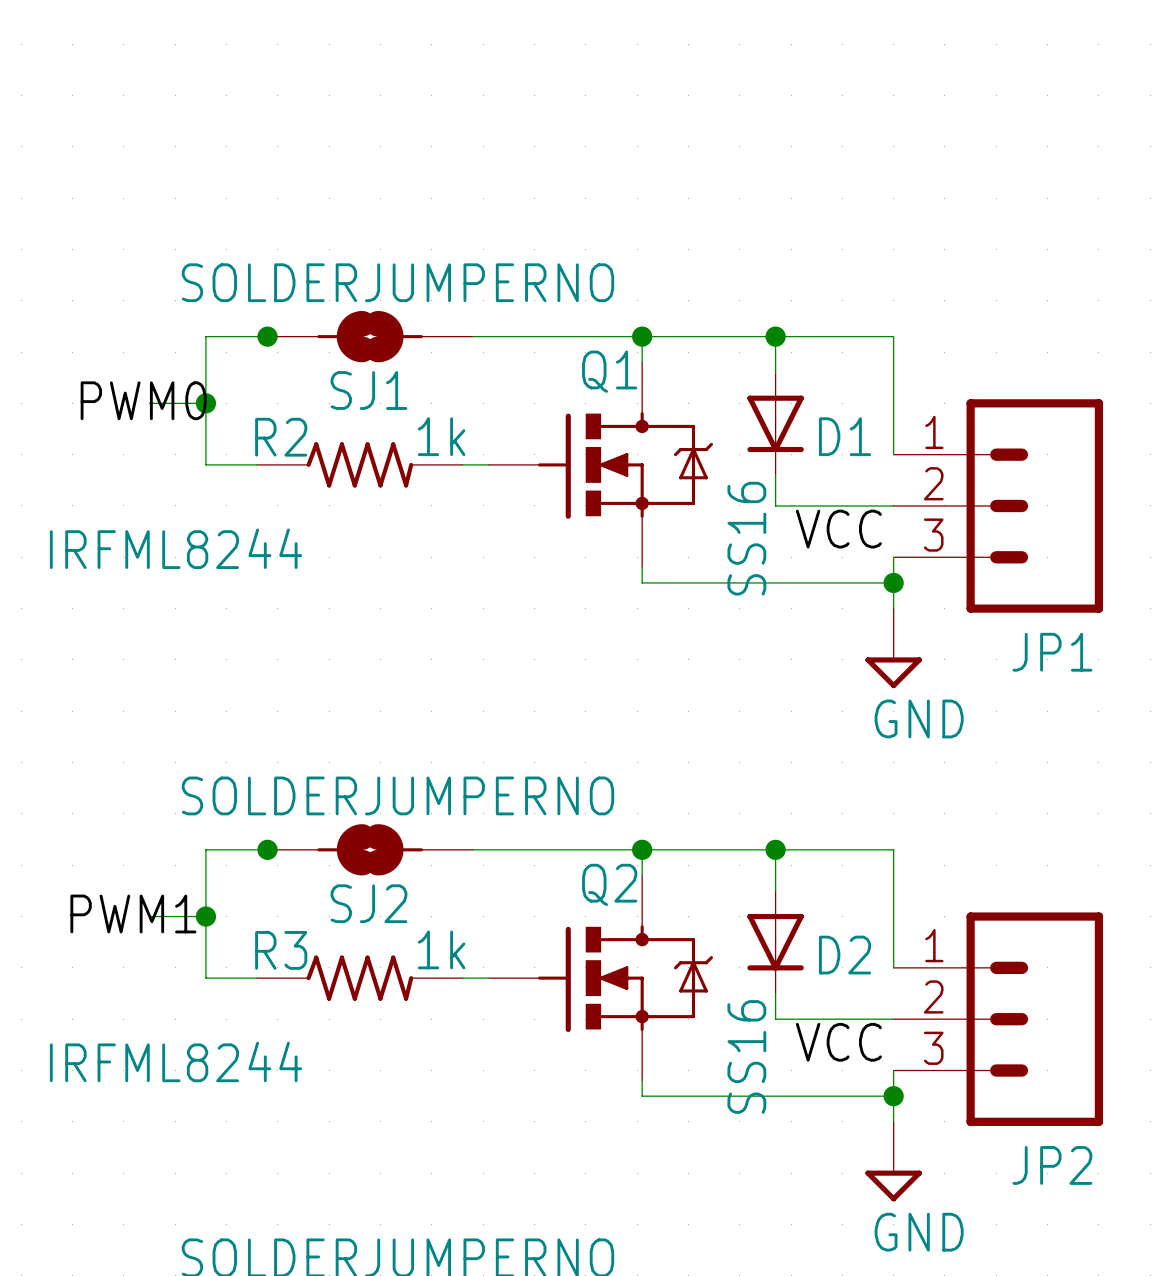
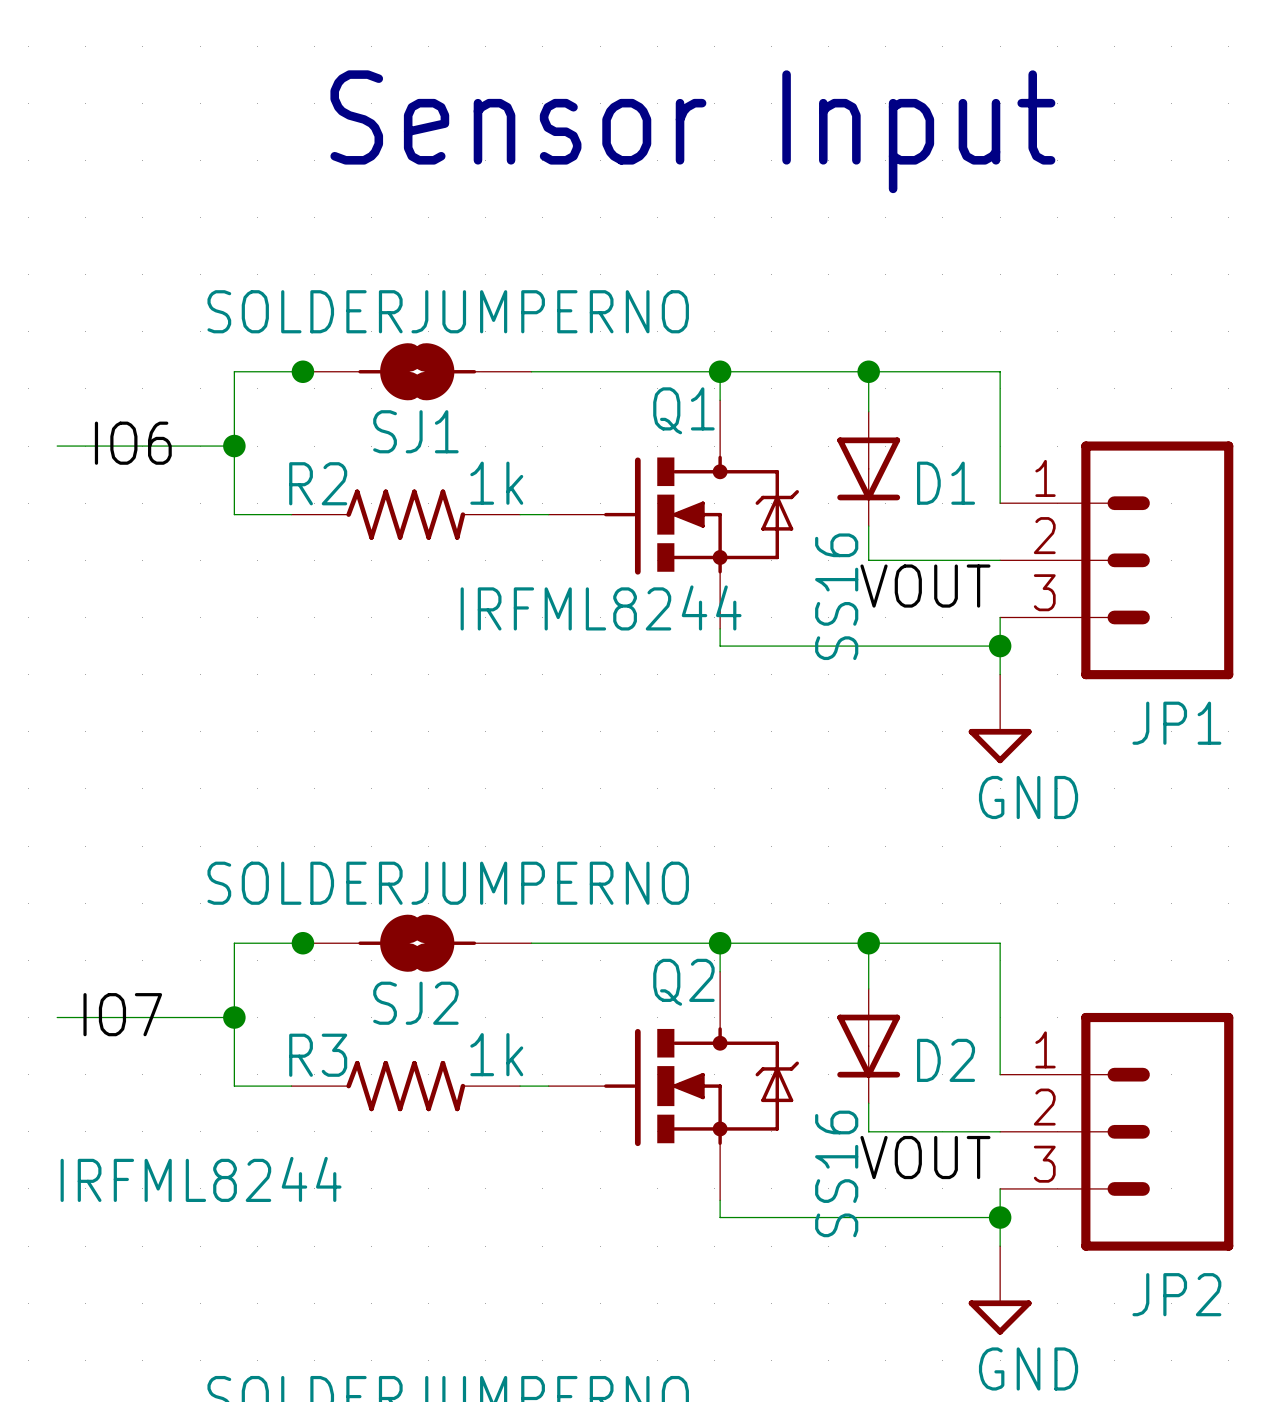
text: none -> Sensor Input (692, 131)
label: PWM0 (143, 400) -> IO6 (133, 443)
wire: none -> (57, 446) (171, 446)
label: VCC (838, 529) -> VOUT (925, 586)
Q1 value position: IRFML8244 (176, 548) -> IRFML8244 (601, 607)
label: PWM1 (133, 913) -> IO7 (122, 1014)
wire: none -> (57, 1017) (171, 1017)
label: VCC (838, 1042) -> VOUT (925, 1157)

